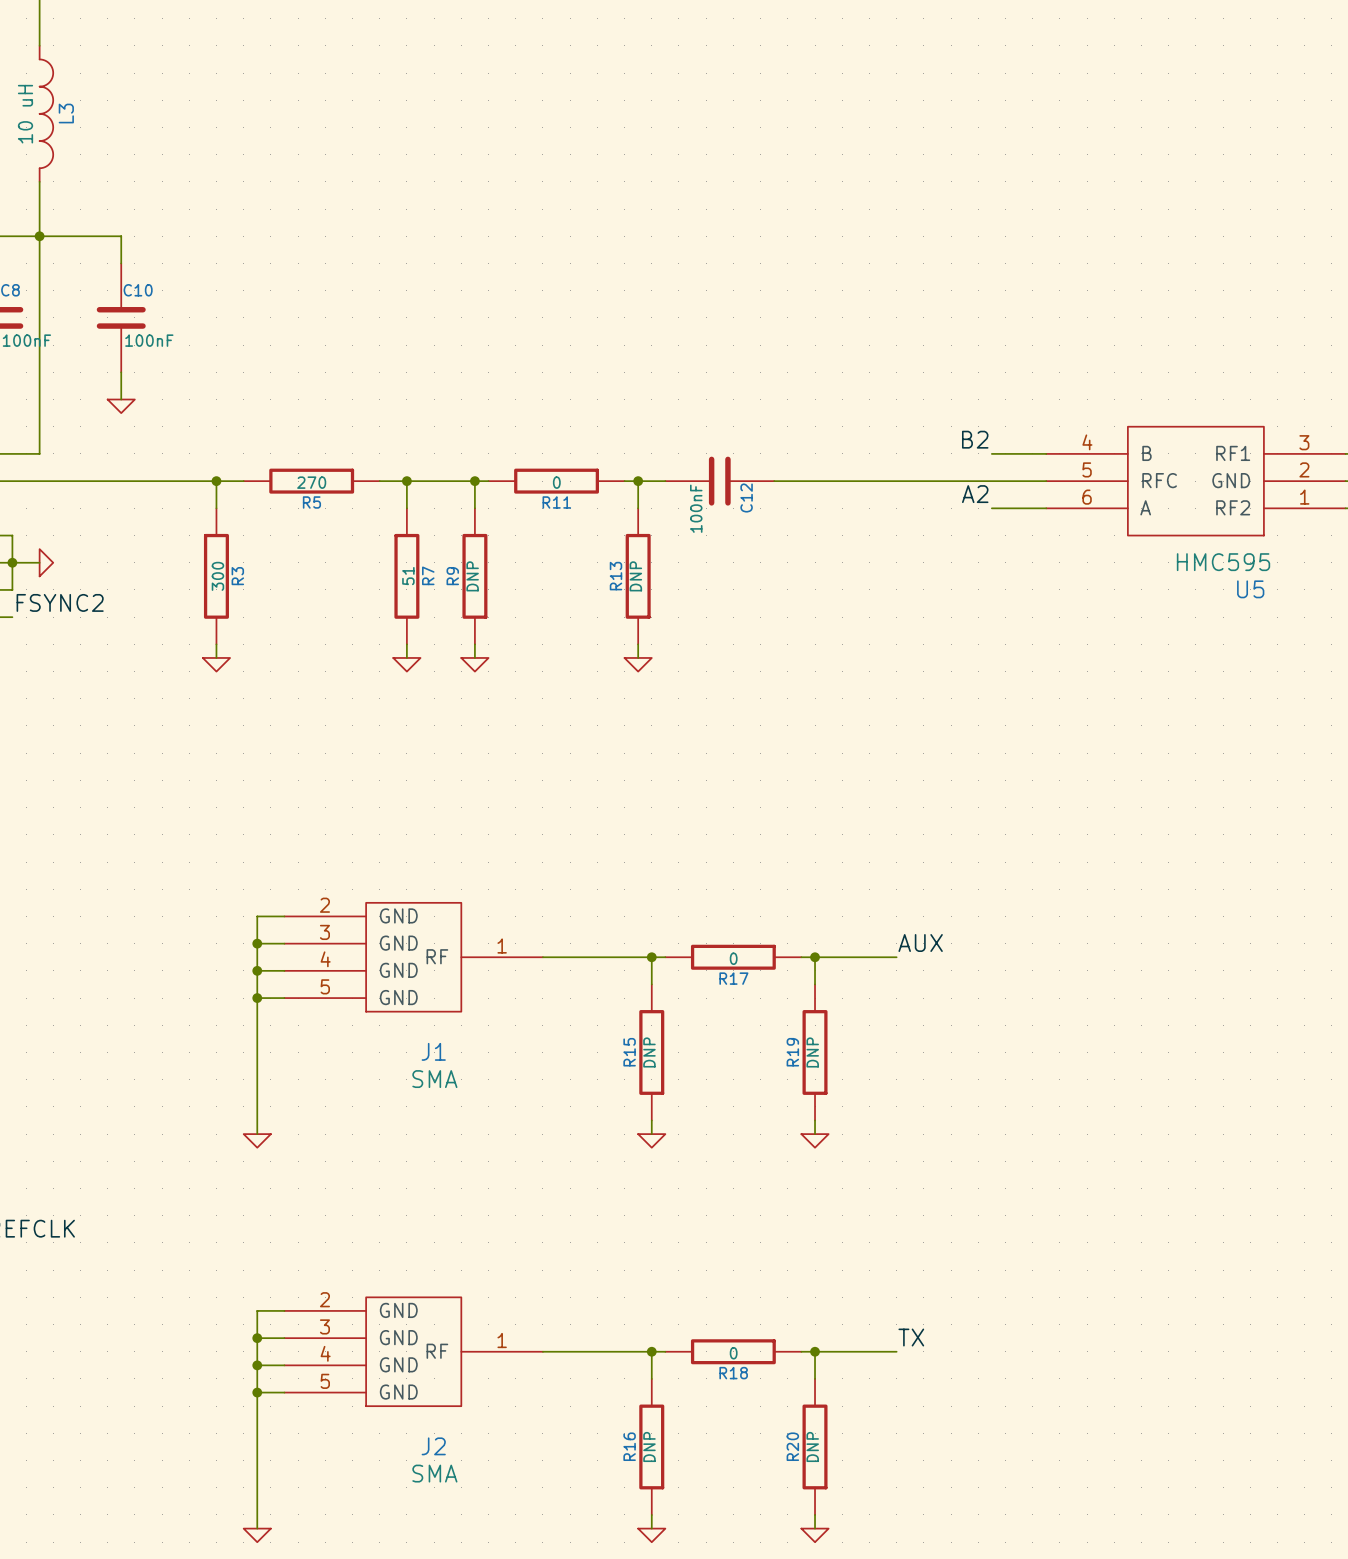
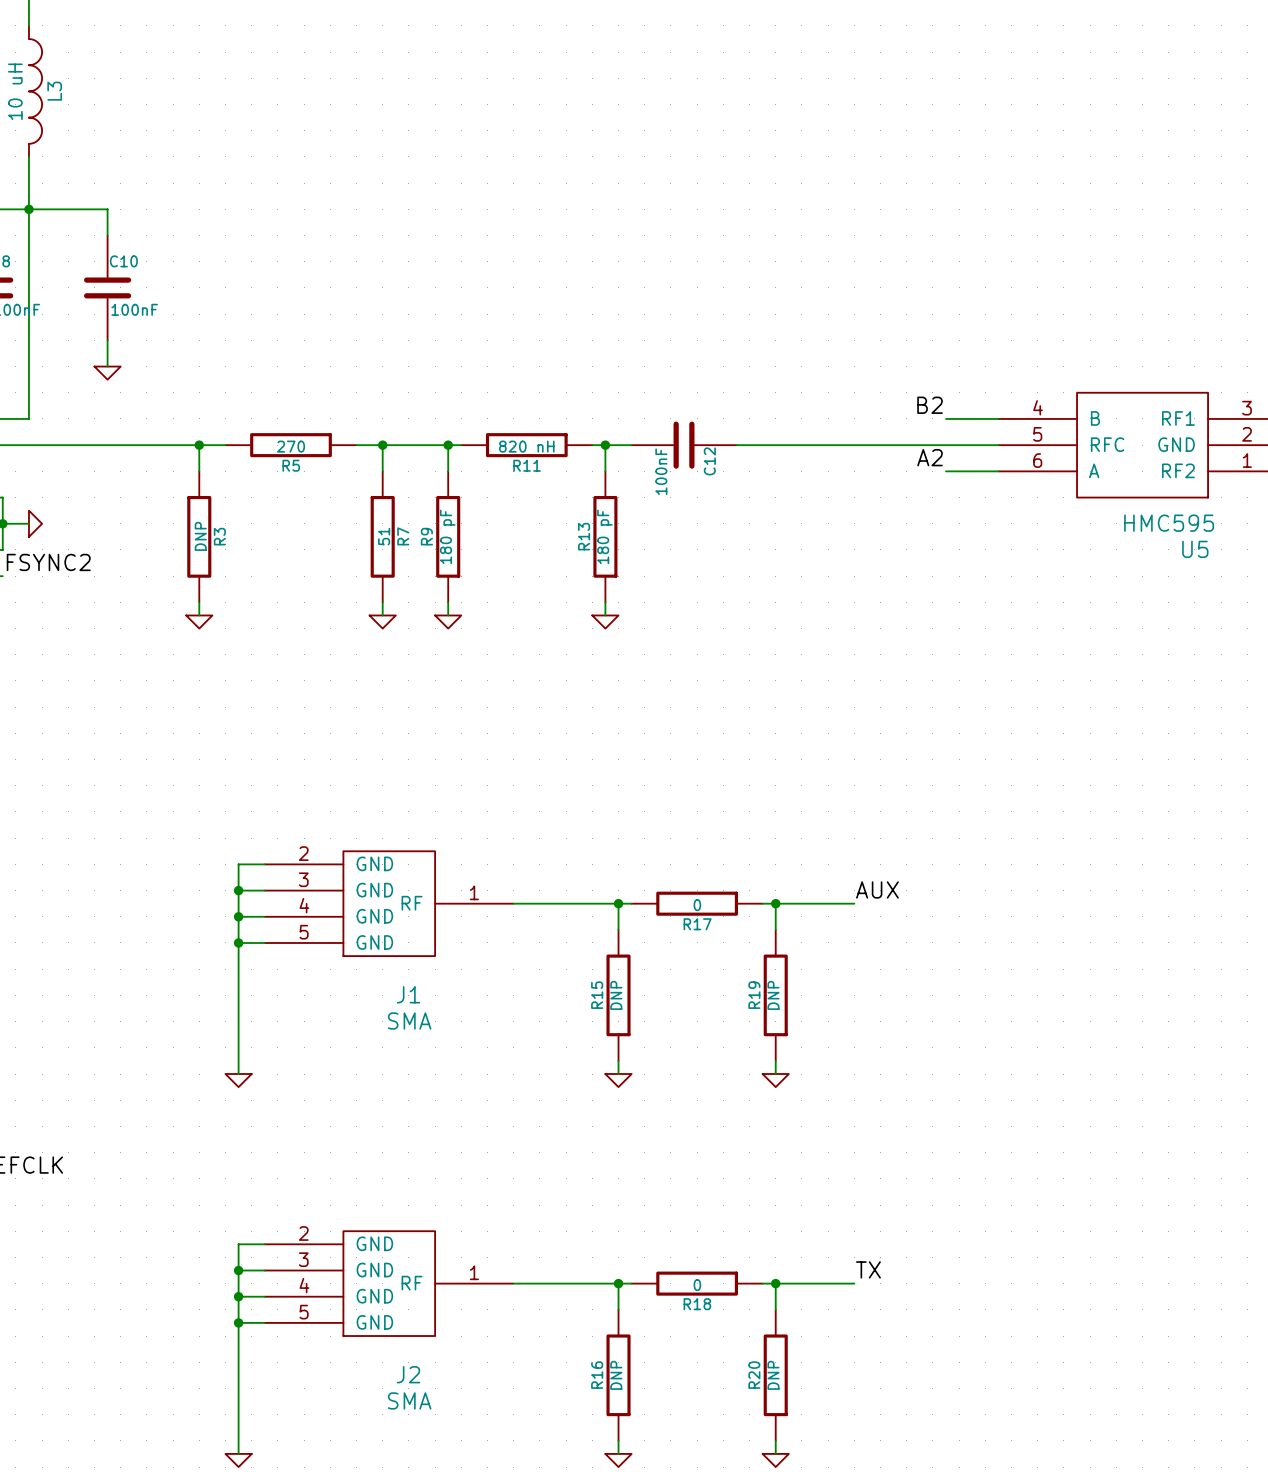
R11 value: 0 (556, 482) -> 820 nH (526, 446)
R3 value: 300 (217, 576) -> DNP (200, 536)
R9 value: DNP (472, 576) -> 180 pF (447, 536)
R13 value: DNP (635, 576) -> 180 pF (604, 536)

